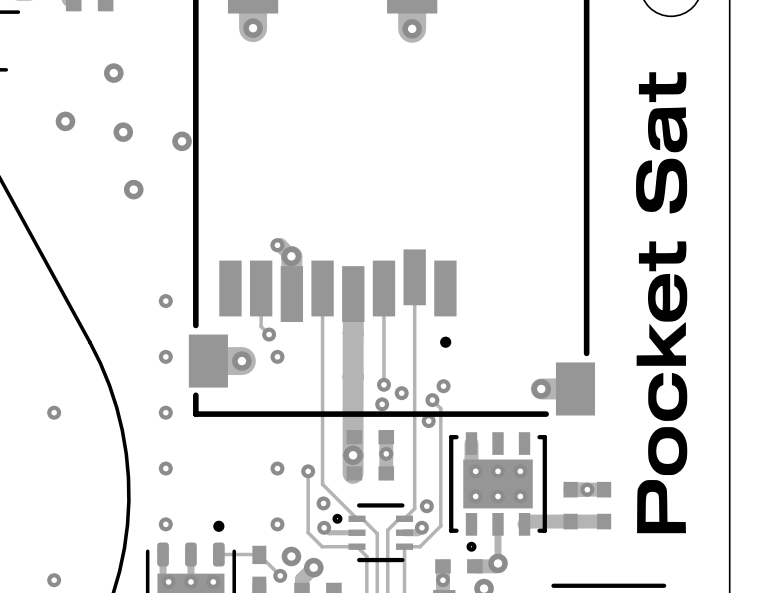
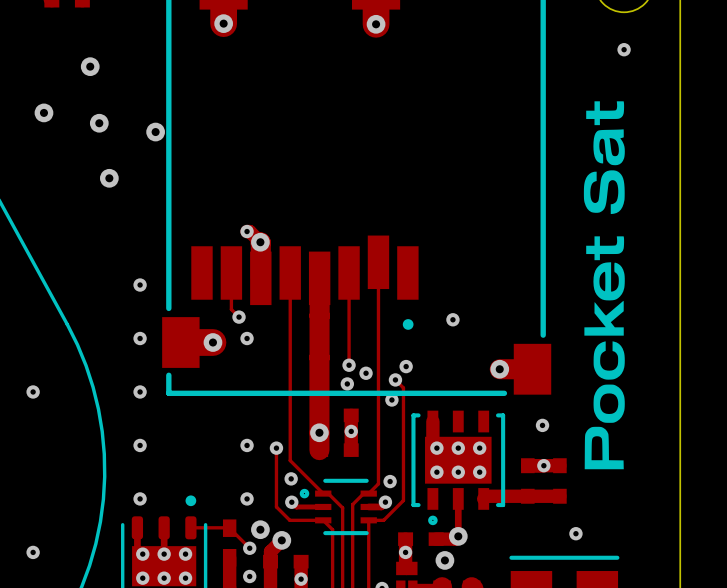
via: none -> (624, 49)
drawing shape: [636, 72, 688, 534] -> [583, 101, 625, 470]
via: none -> (452, 319)
via: none -> (542, 425)
via: none -> (575, 533)

